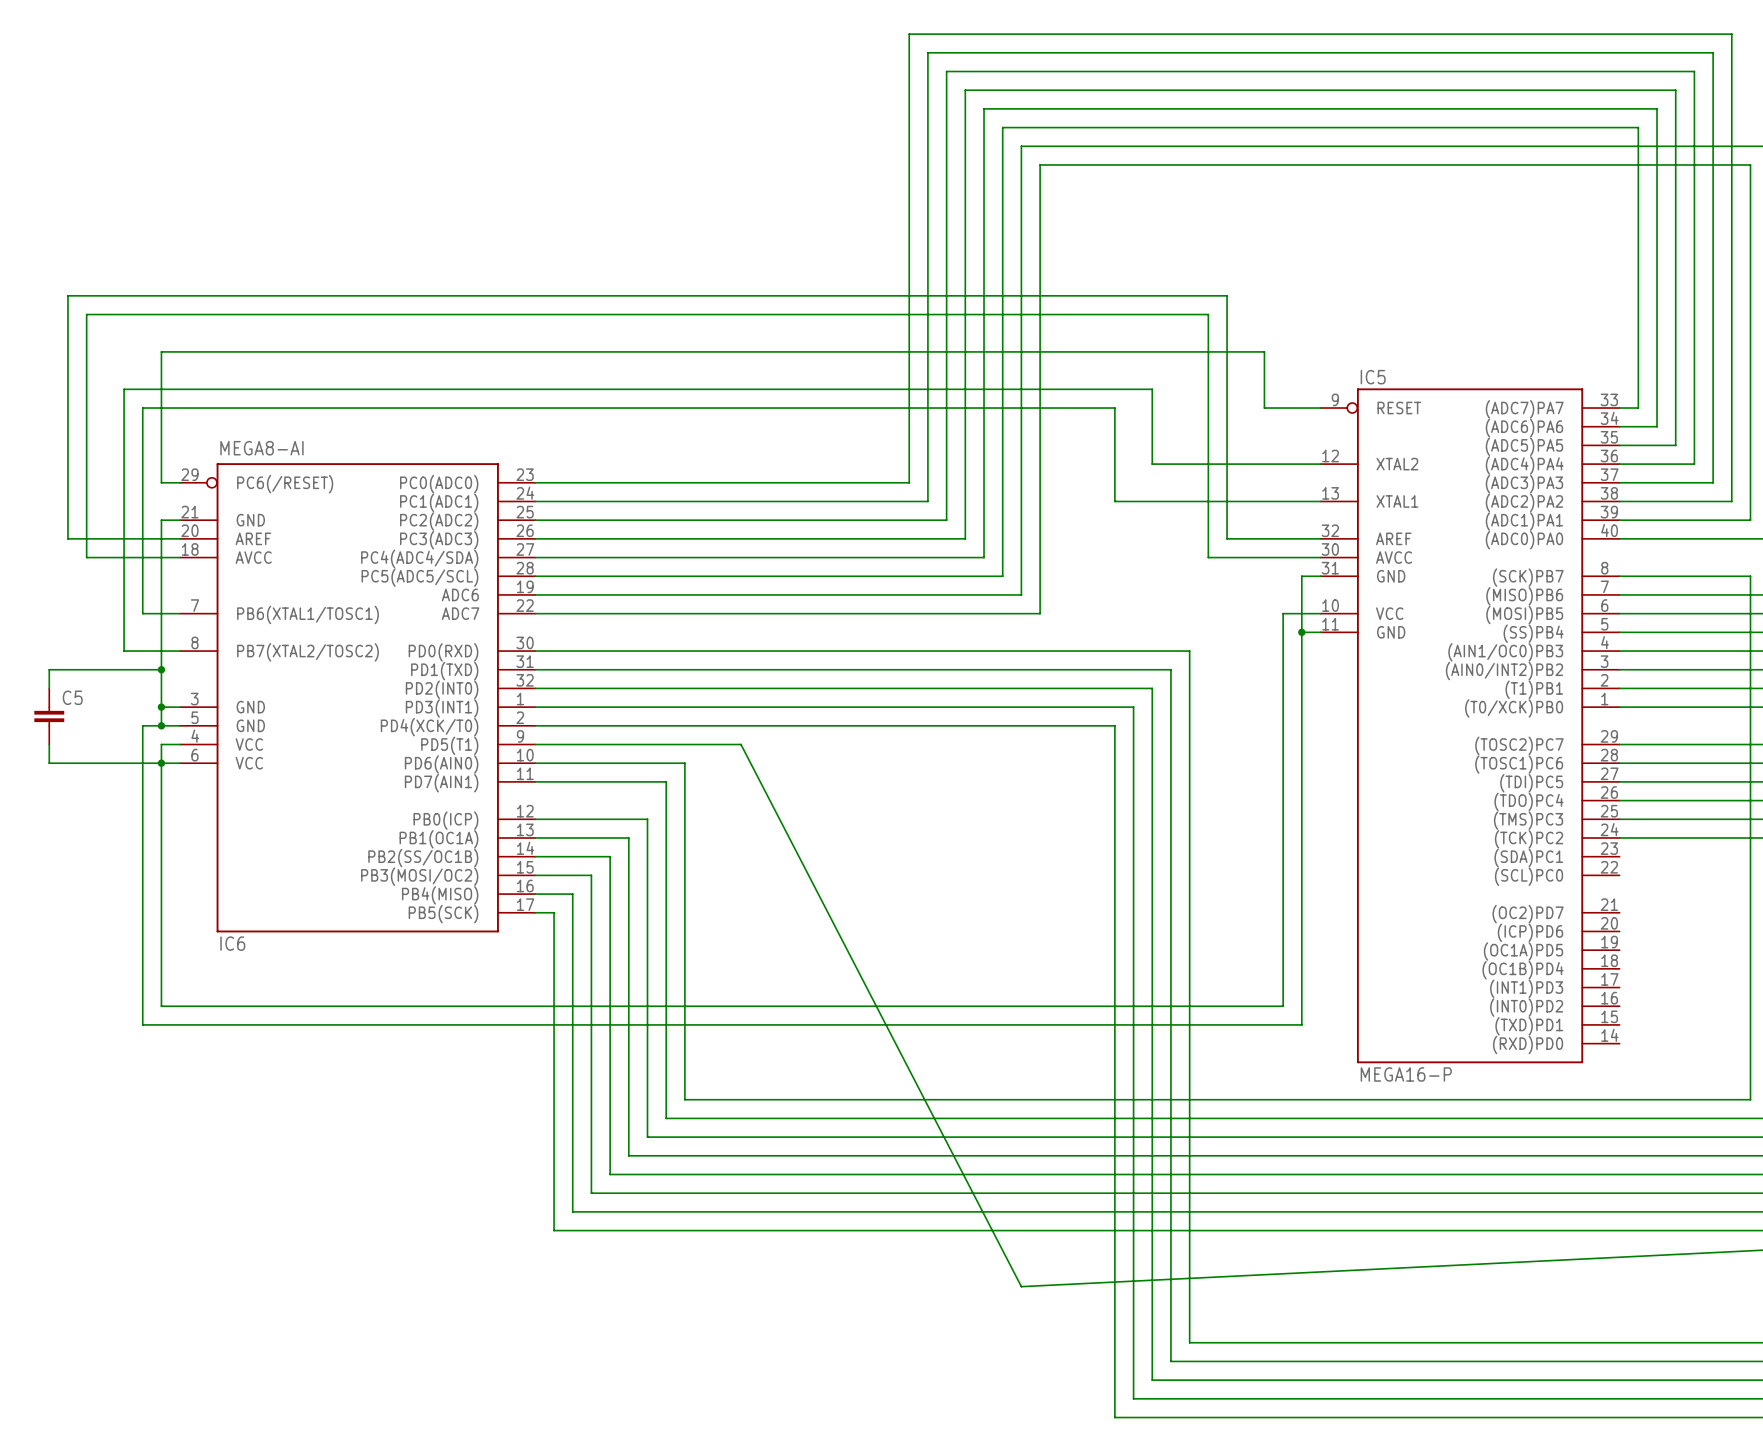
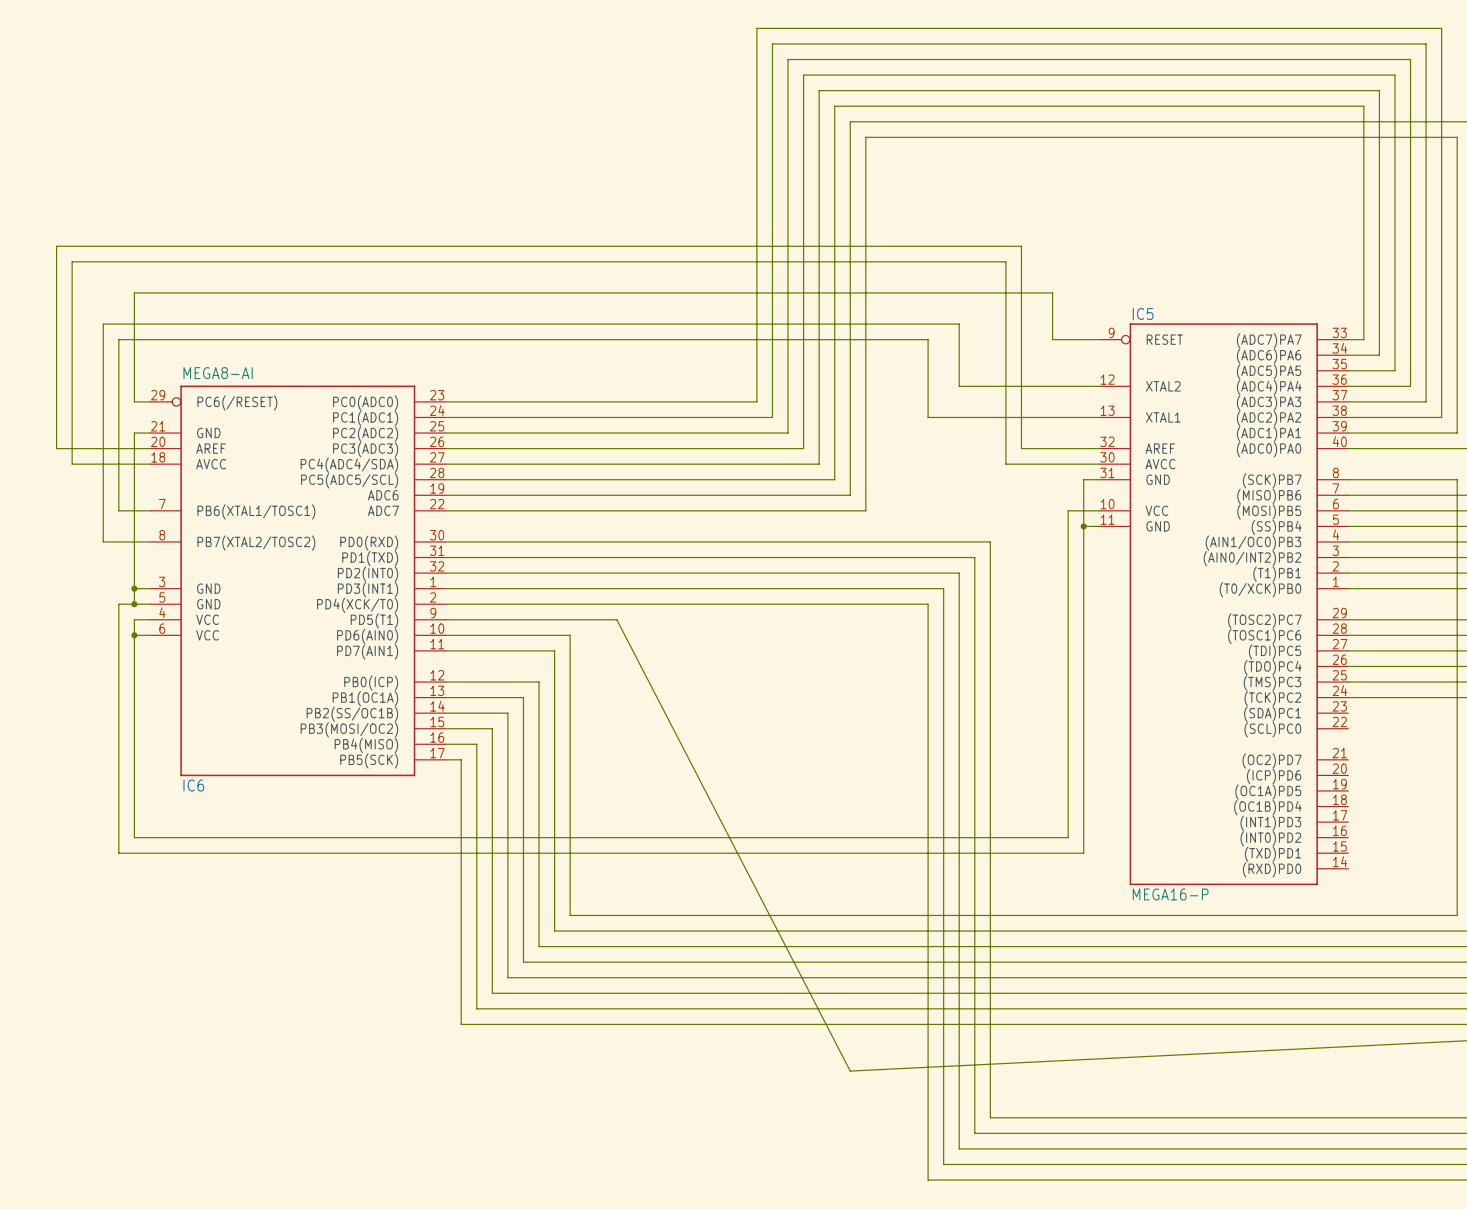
wire: (161, 669) (49, 669) (49, 688) -> none
junction: (161, 669) -> none
C5: (49, 716) -> none
wire: (49, 744) (49, 763) (161, 763) -> none

